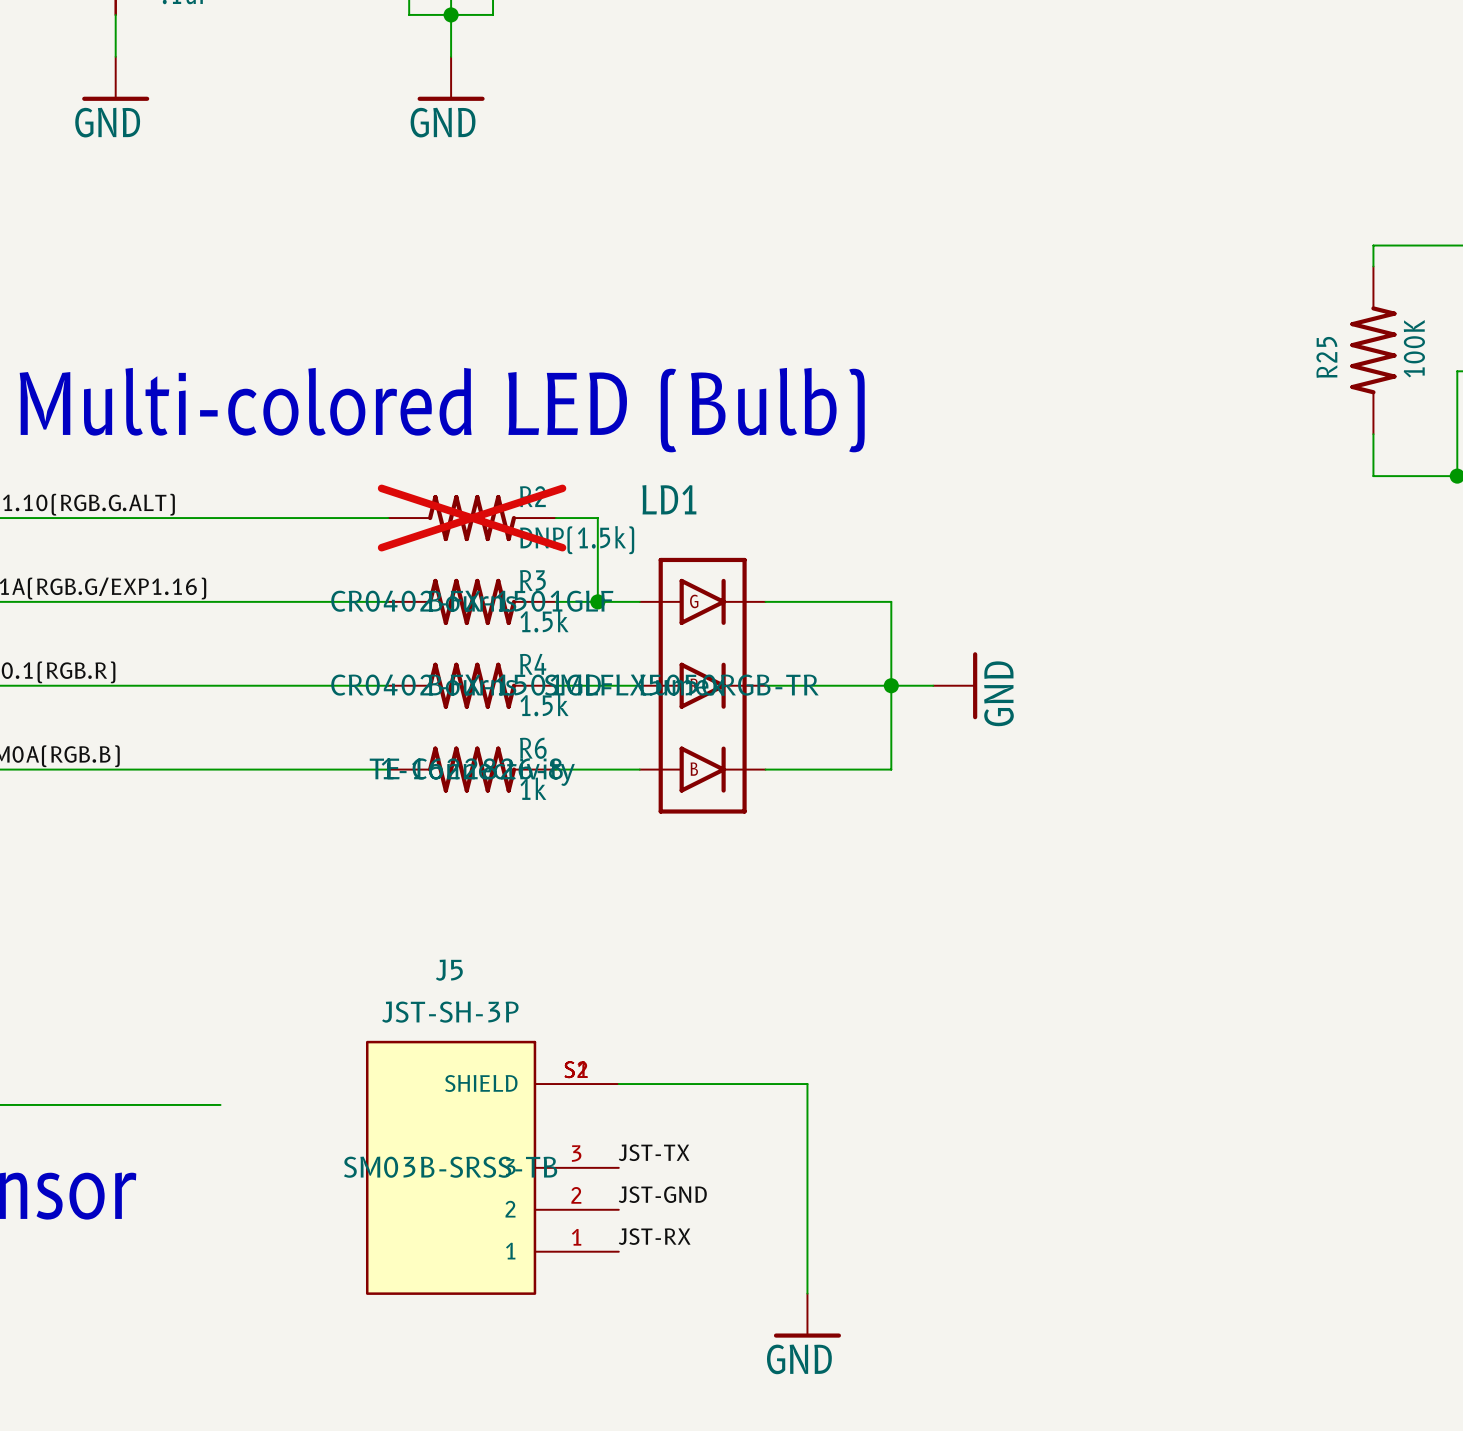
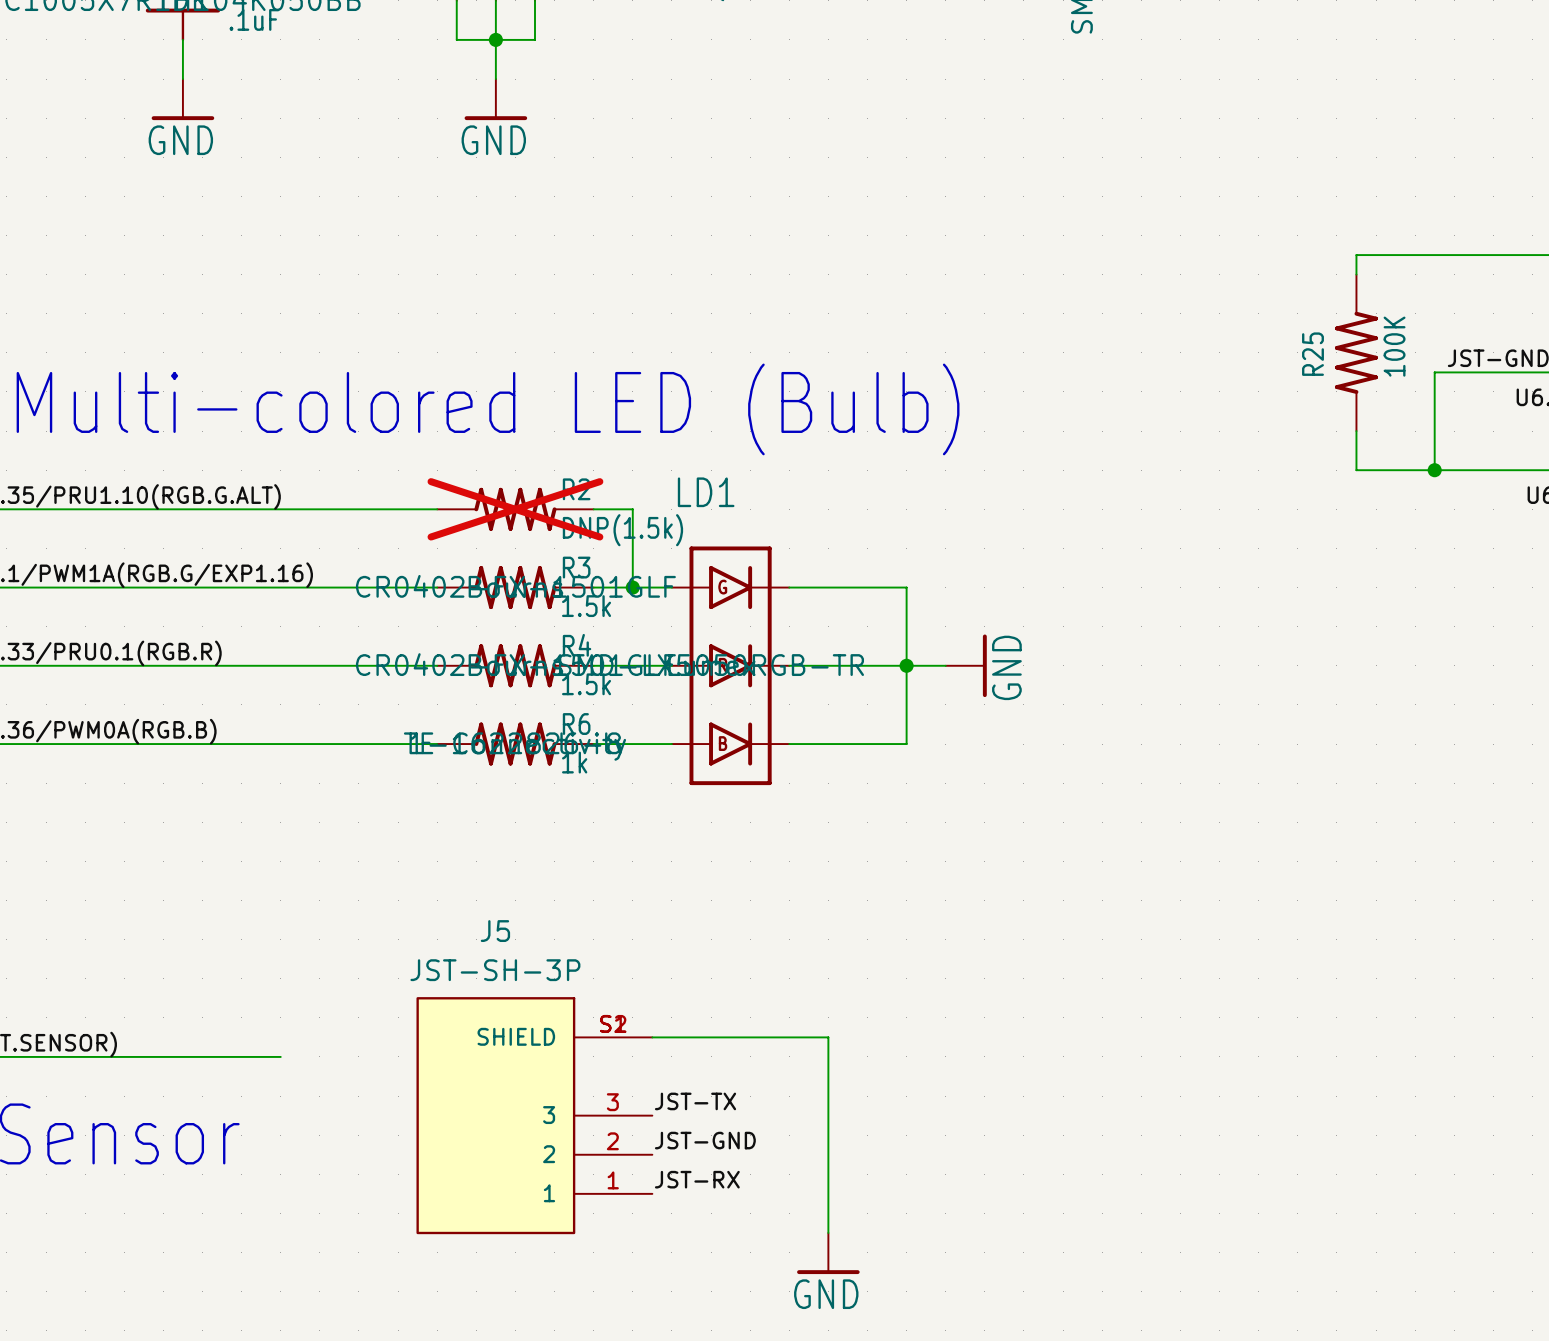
J5 text: SM03B-SRSS-TB (450, 1167) -> none

